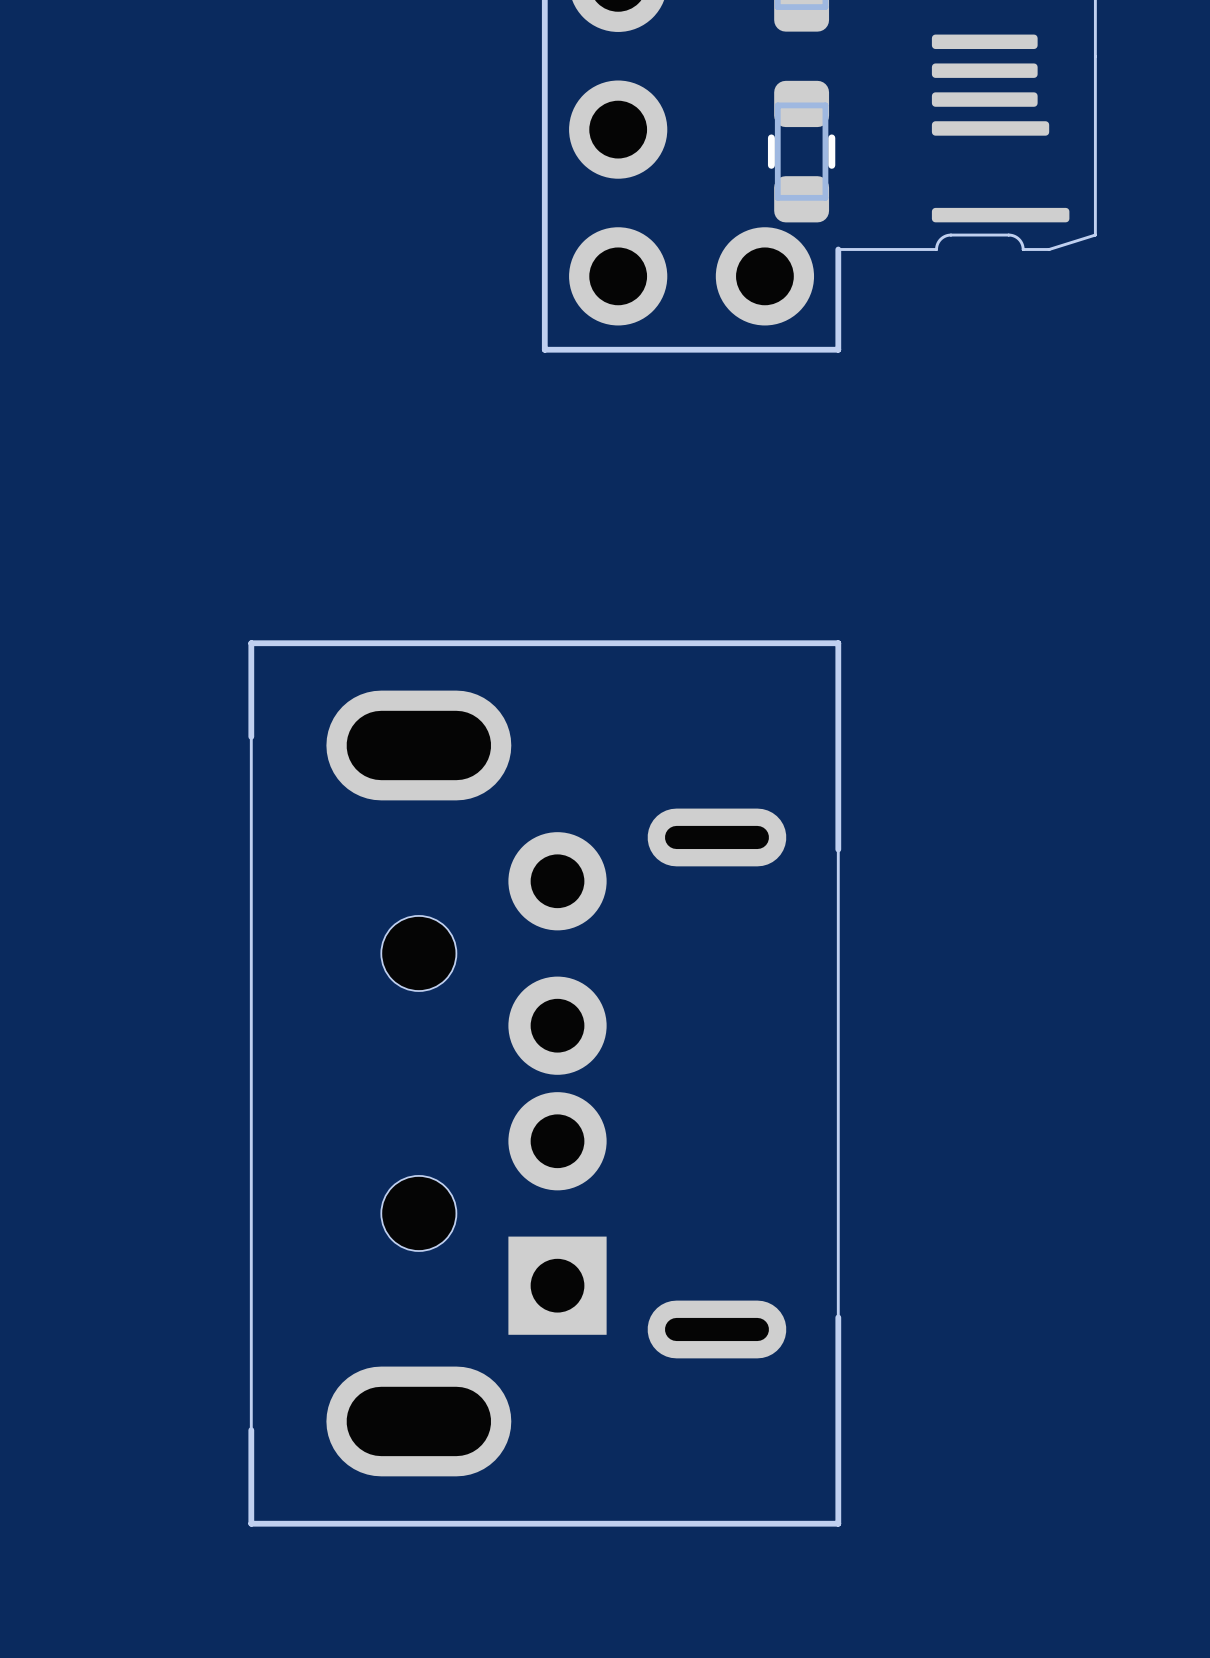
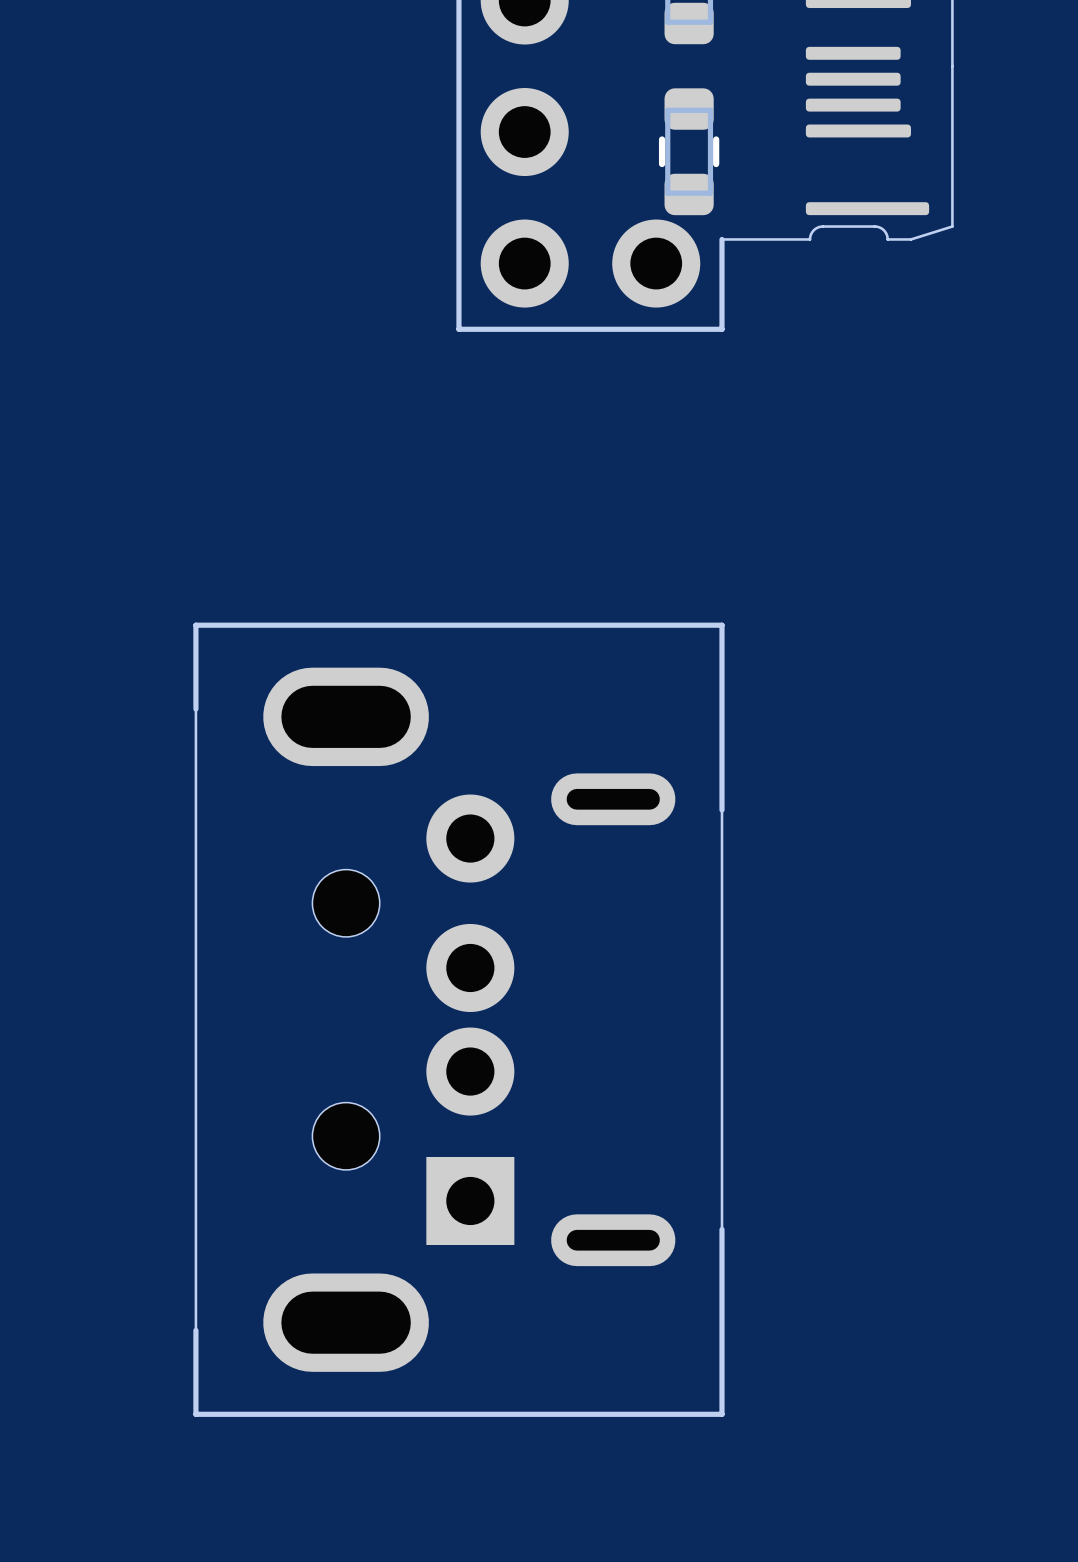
board edge: (838, 679) (838, 643) (251, 643) (251, 679) -> (721, 625) (195, 625)
part position: (428, 1083) -> (354, 1019)
part position: (743, 1083) -> (637, 1019)
board edge: (838, 1317) (838, 1354) -> (721, 777) (721, 810)
board edge: (251, 1430) (251, 1466) -> (195, 676) (195, 709)
board edge: (838, 1523) (251, 1523) -> (721, 1381) (721, 1414) (195, 1414) (195, 1381)

